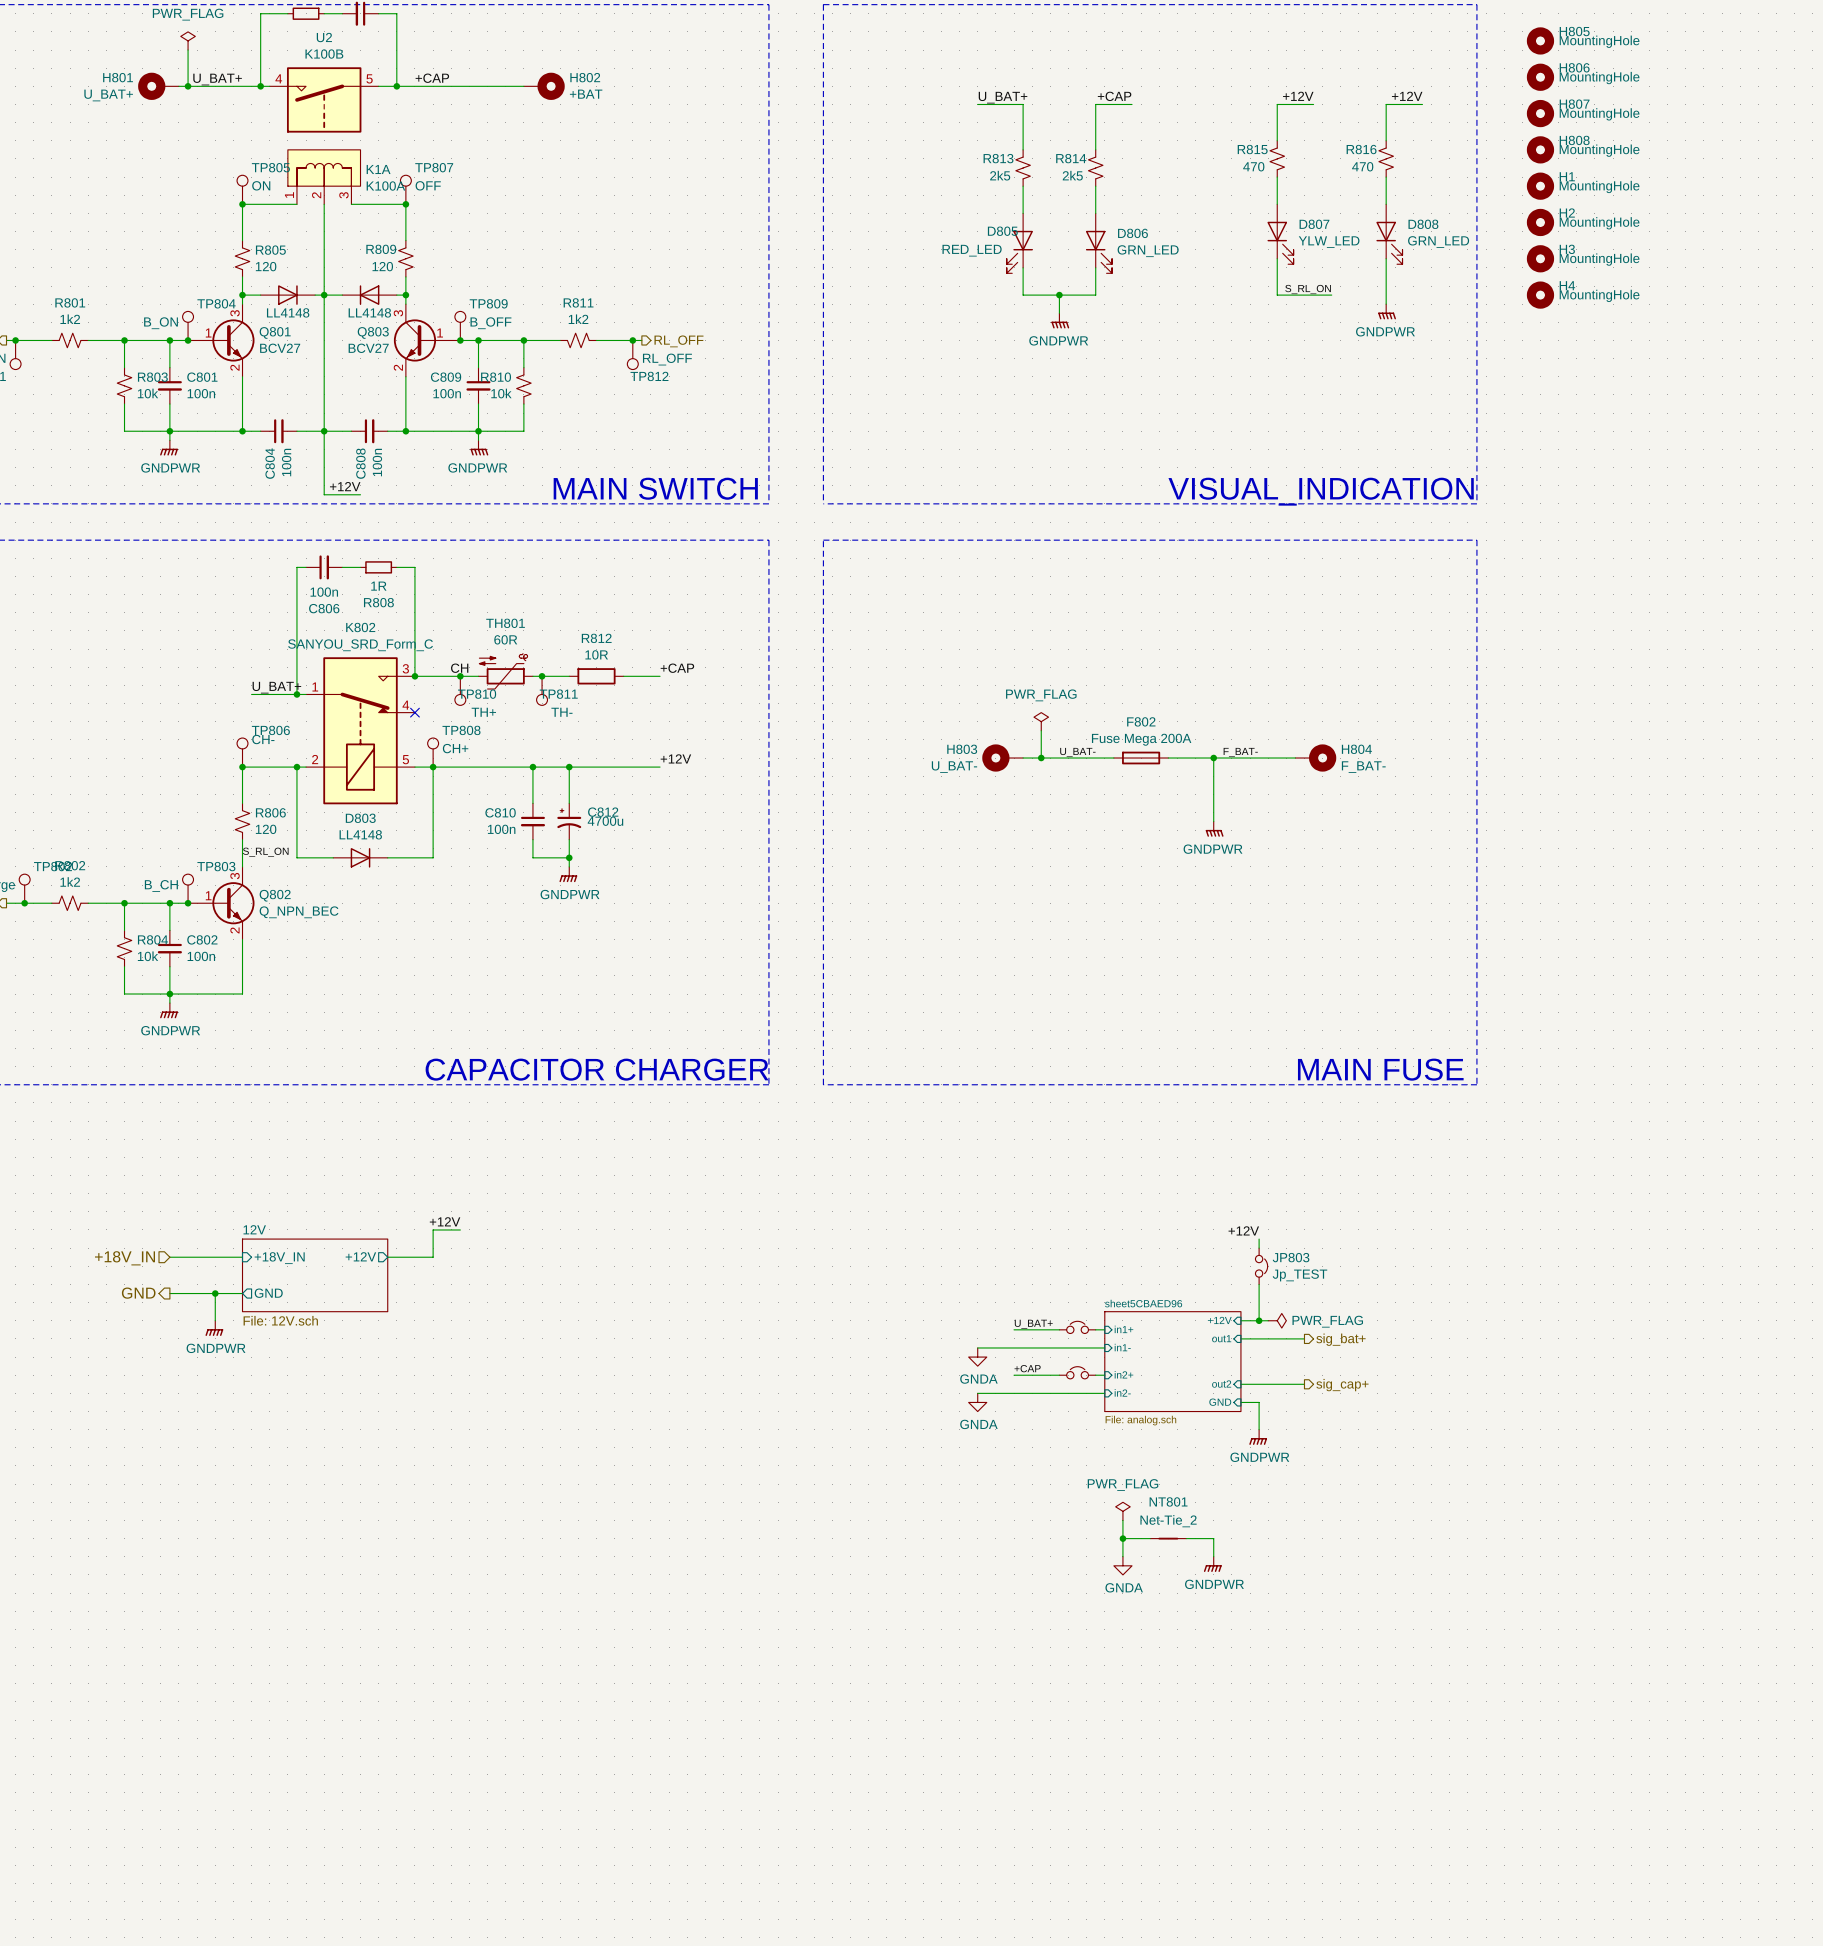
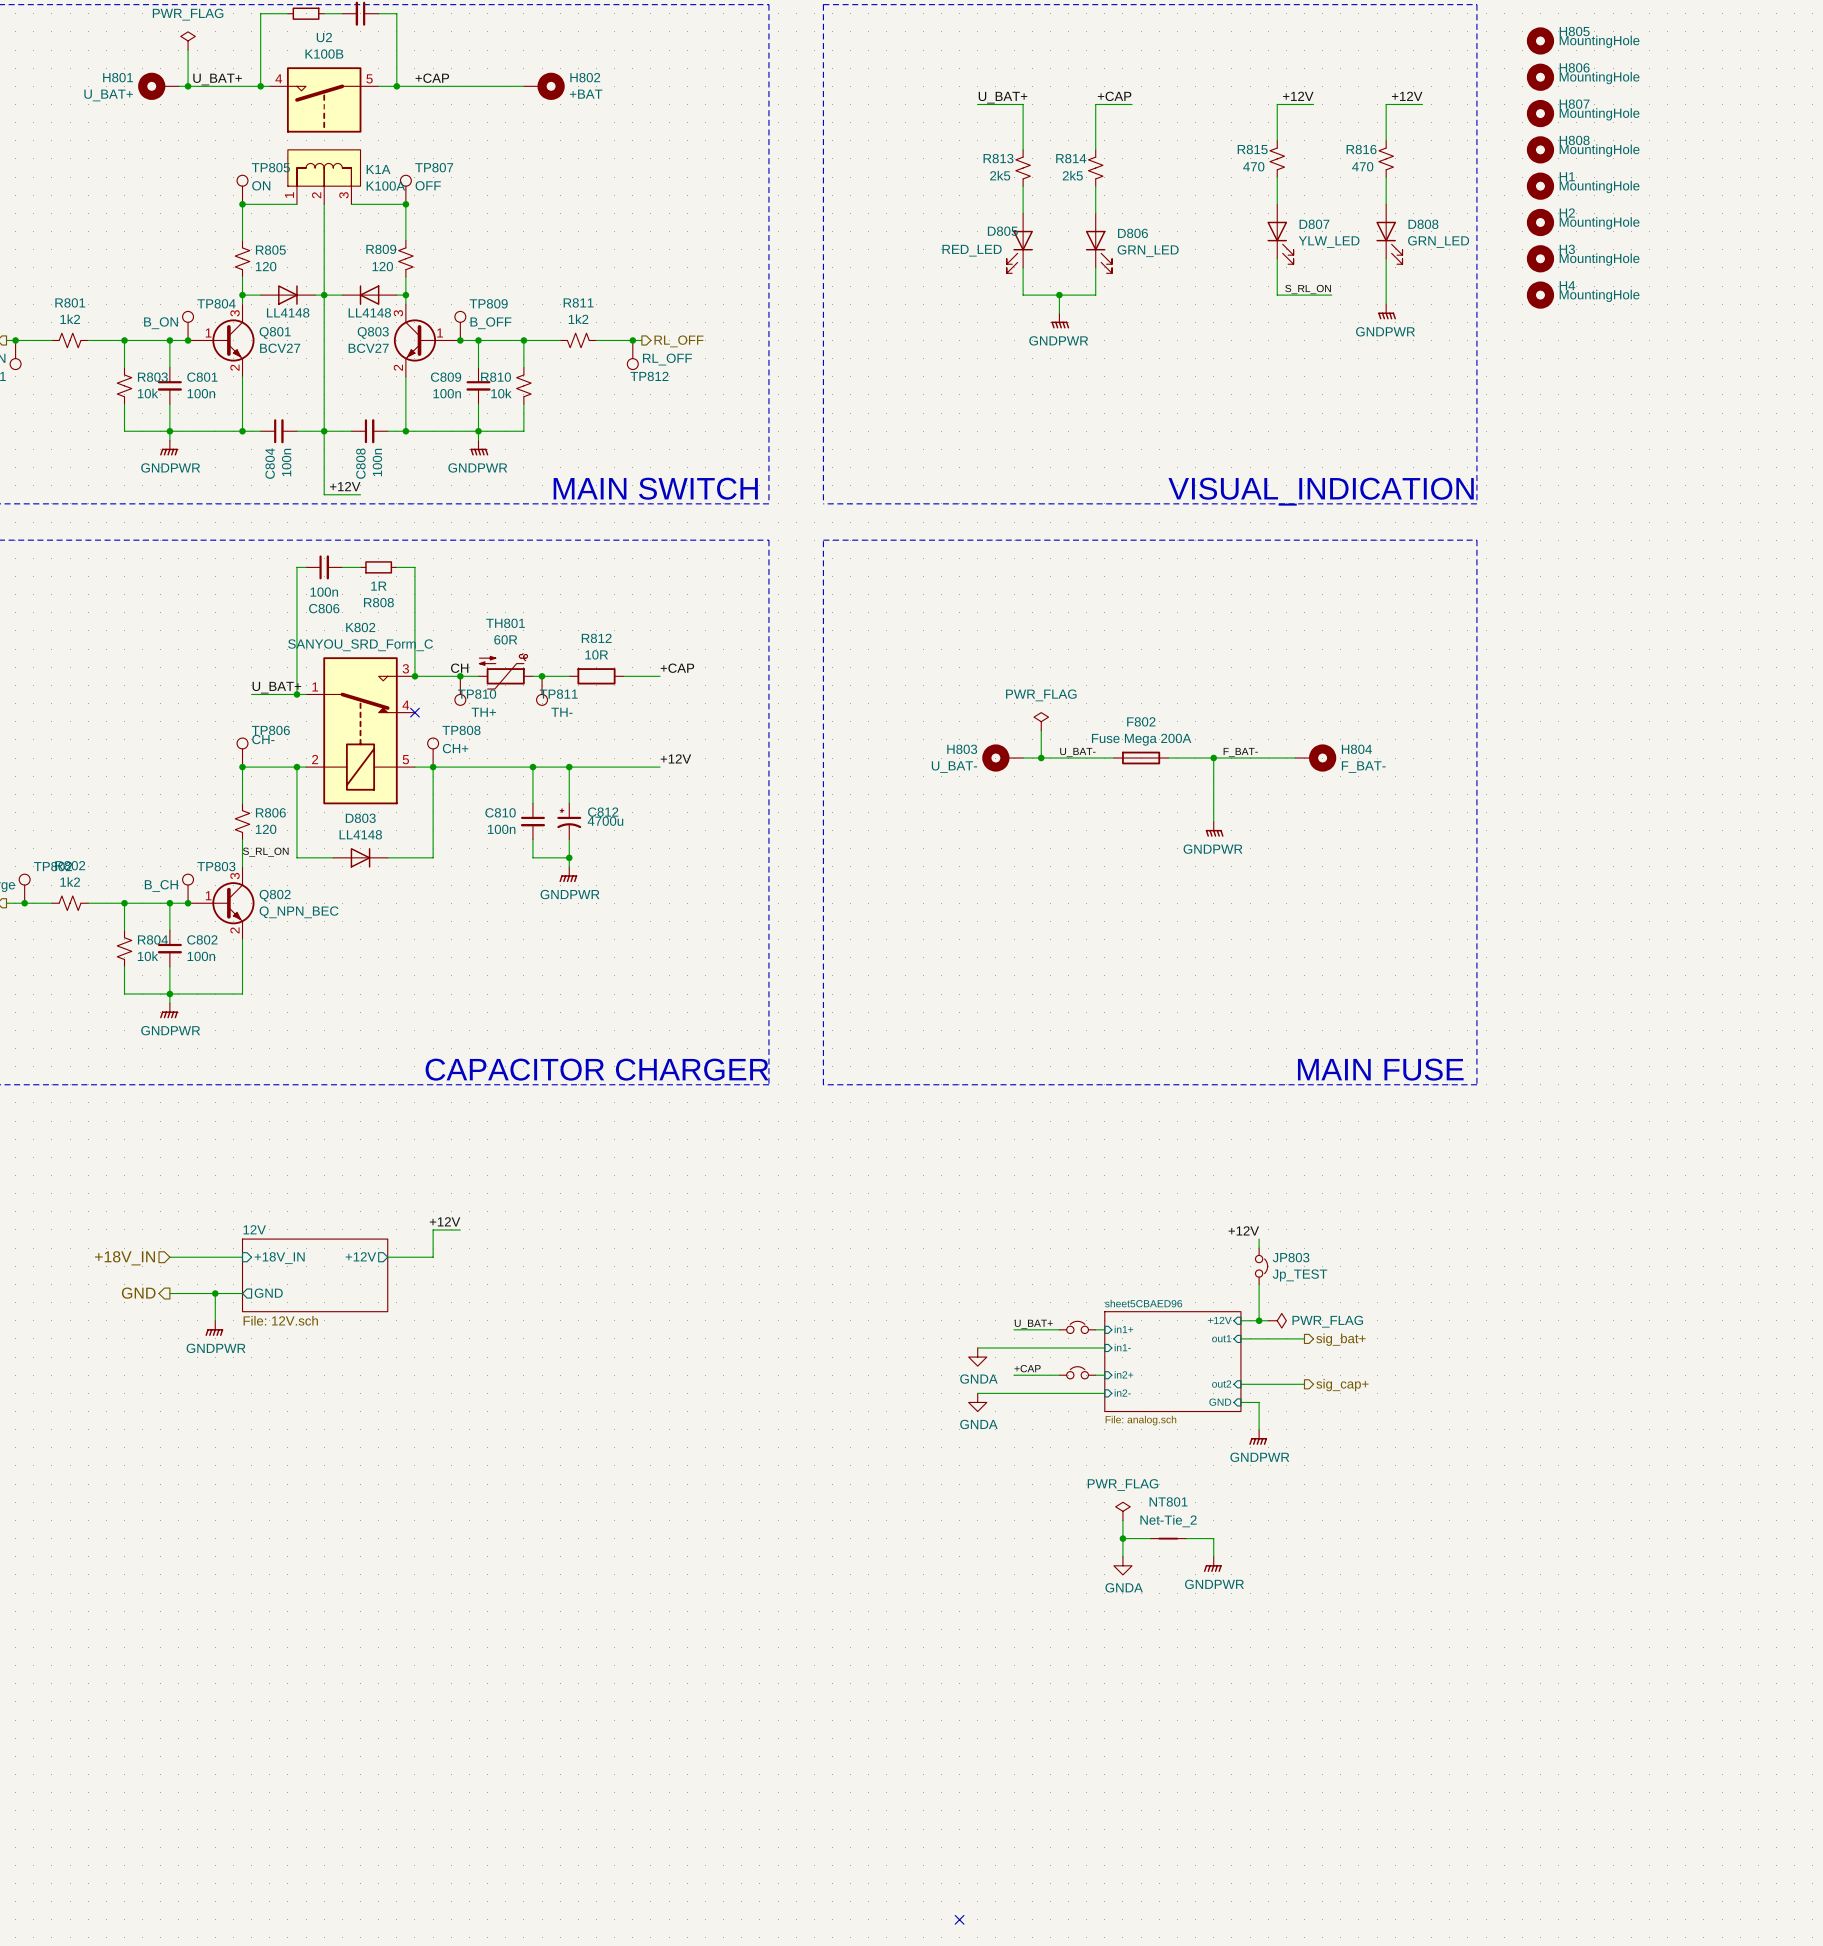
no-connect mark: none -> (959, 1919)

